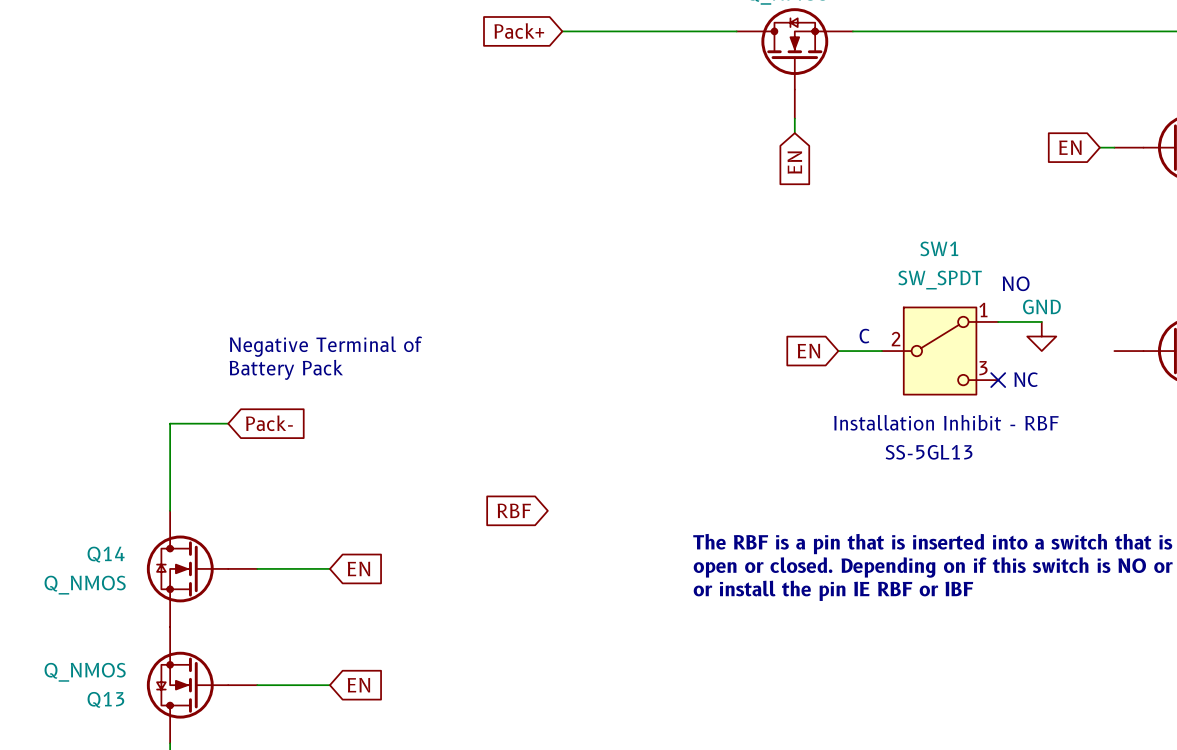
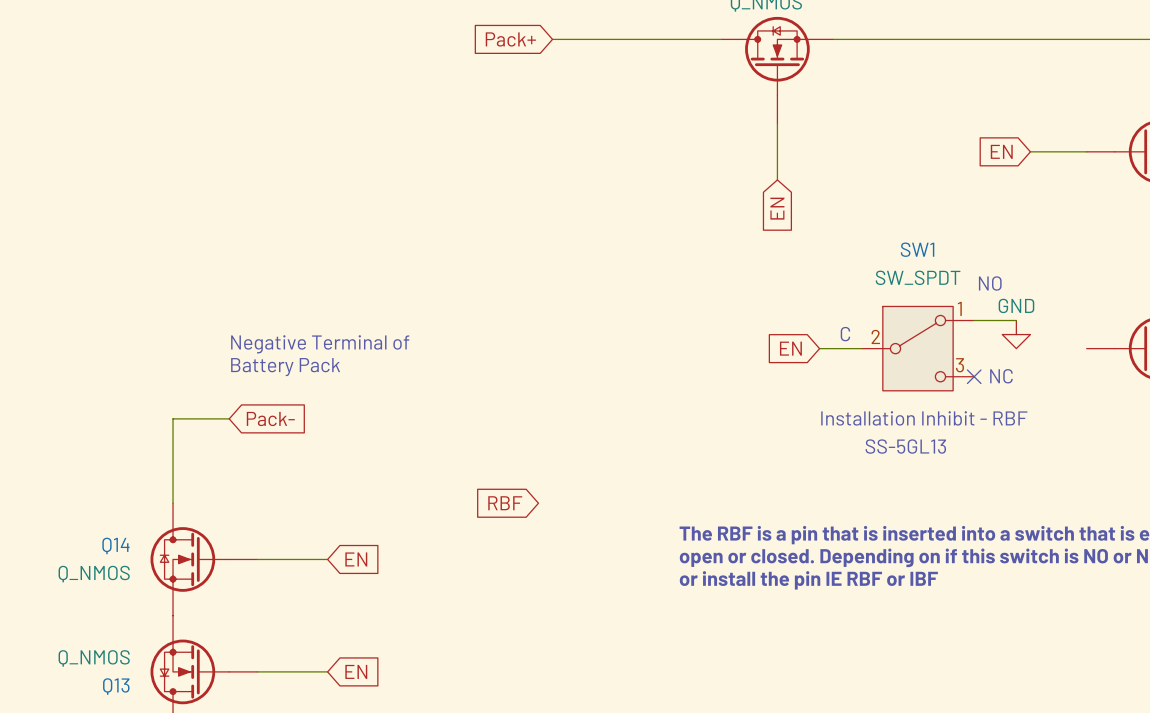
wire: none -> (777, 137) (777, 179)
wire: none -> (1030, 151) (1072, 151)
global label position: EN (1070, 147) -> EN (1001, 151)
global label position: EN (794, 162) -> EN (777, 208)

